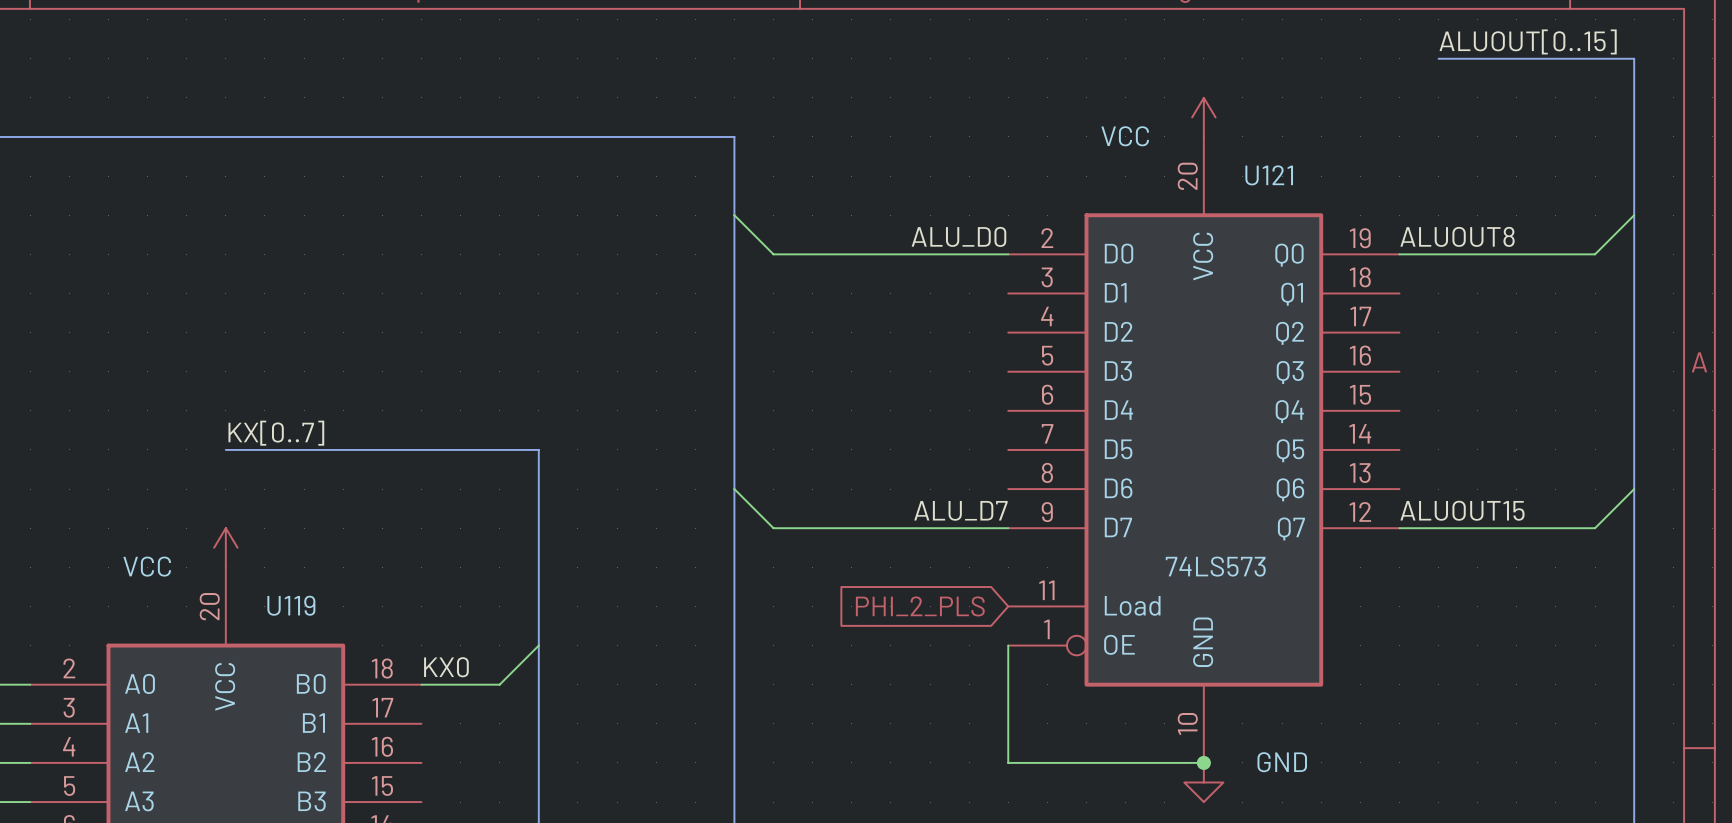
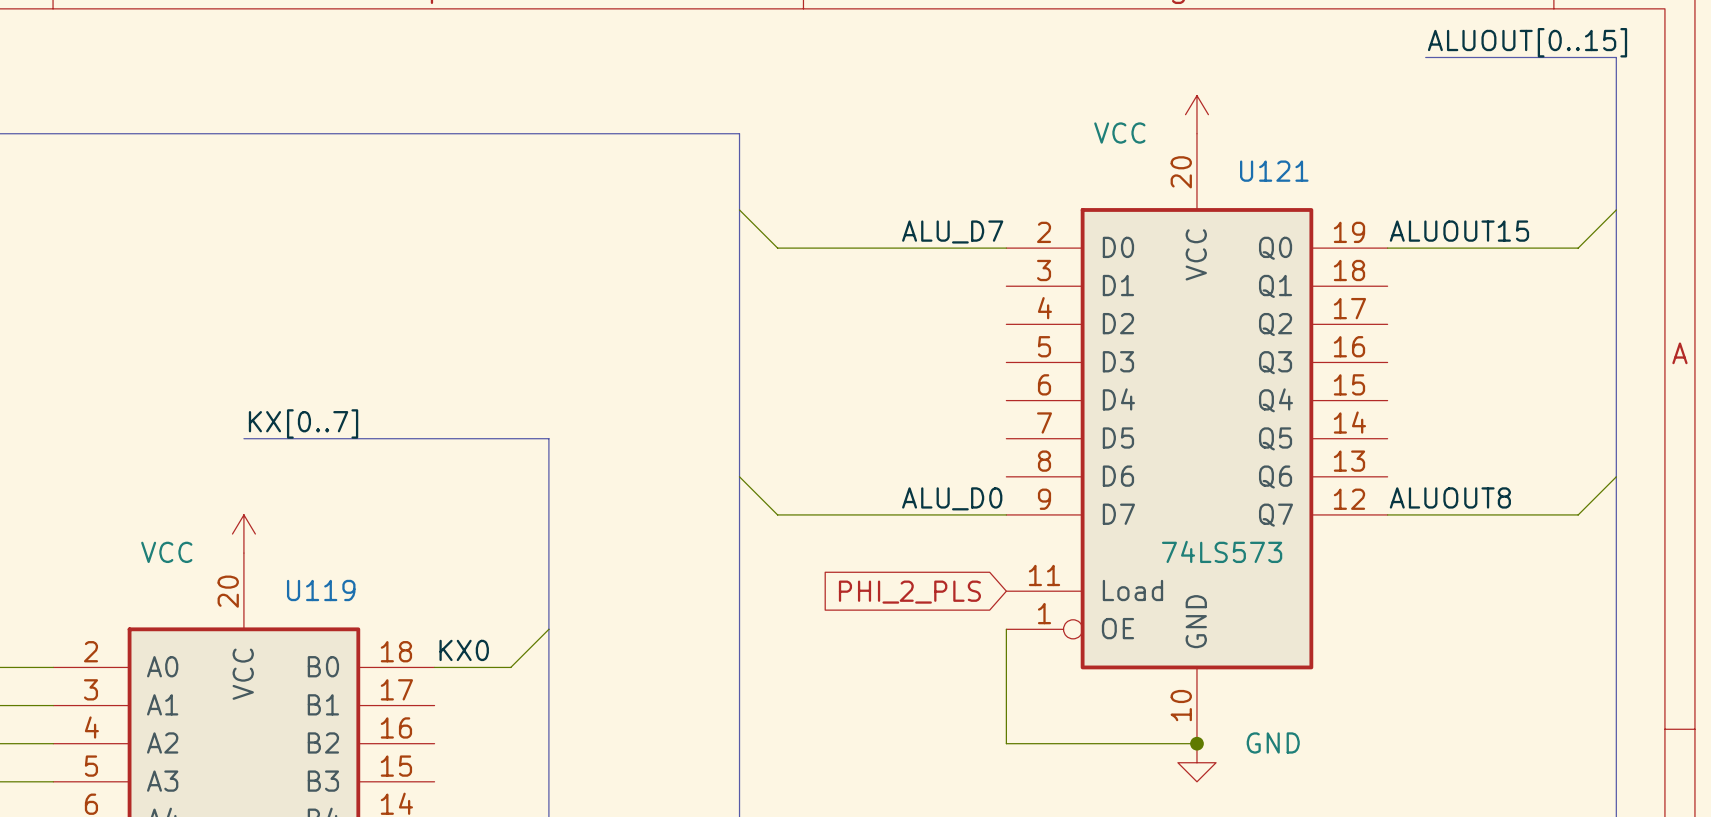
label: ALU_D0 (958, 236) -> ALU_D7 (952, 232)
label: ALUOUT8 (1457, 236) -> ALUOUT15 (1459, 231)
label: ALU_D7 (960, 510) -> ALU_D0 (952, 498)
label: ALUOUT15 (1462, 510) -> ALUOUT8 (1450, 497)

